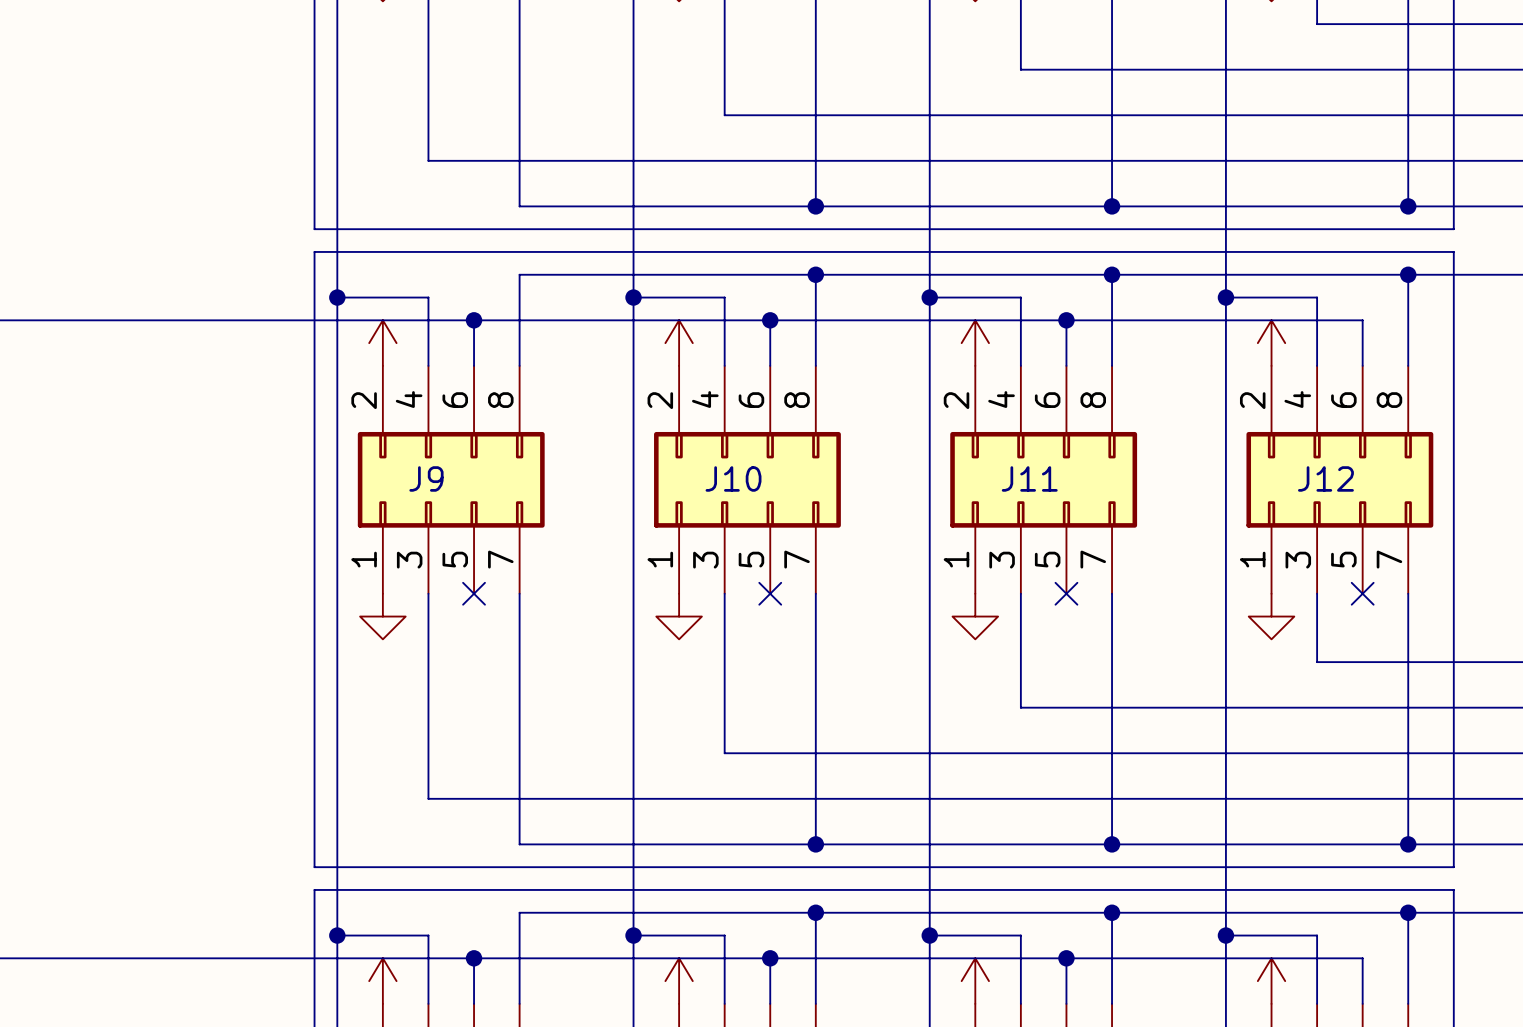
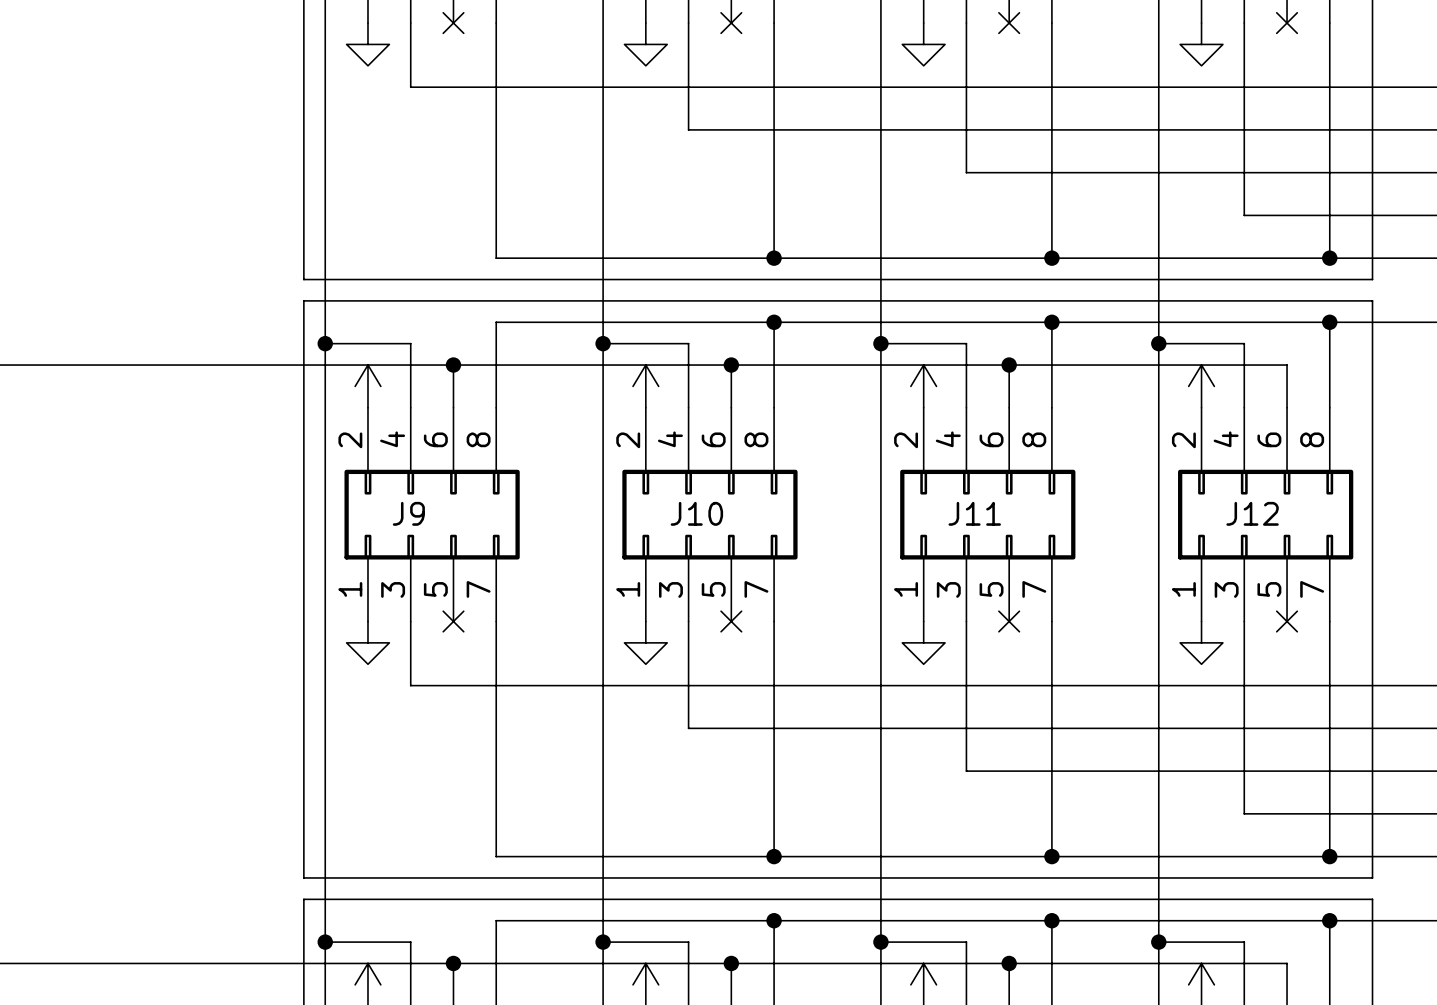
wire: (428, 24) (428, 160) (1317, 160) -> (410, 87) (1244, 87) (1244, 215)
wire: (724, 69) (724, 115) (1020, 115) -> (688, 129) (966, 129) (966, 172)
wire: (428, 662) (428, 798) (1317, 798) -> (410, 685) (1244, 685) (1244, 813)
wire: (724, 707) (724, 753) (1020, 753) -> (688, 728) (966, 728) (966, 771)

